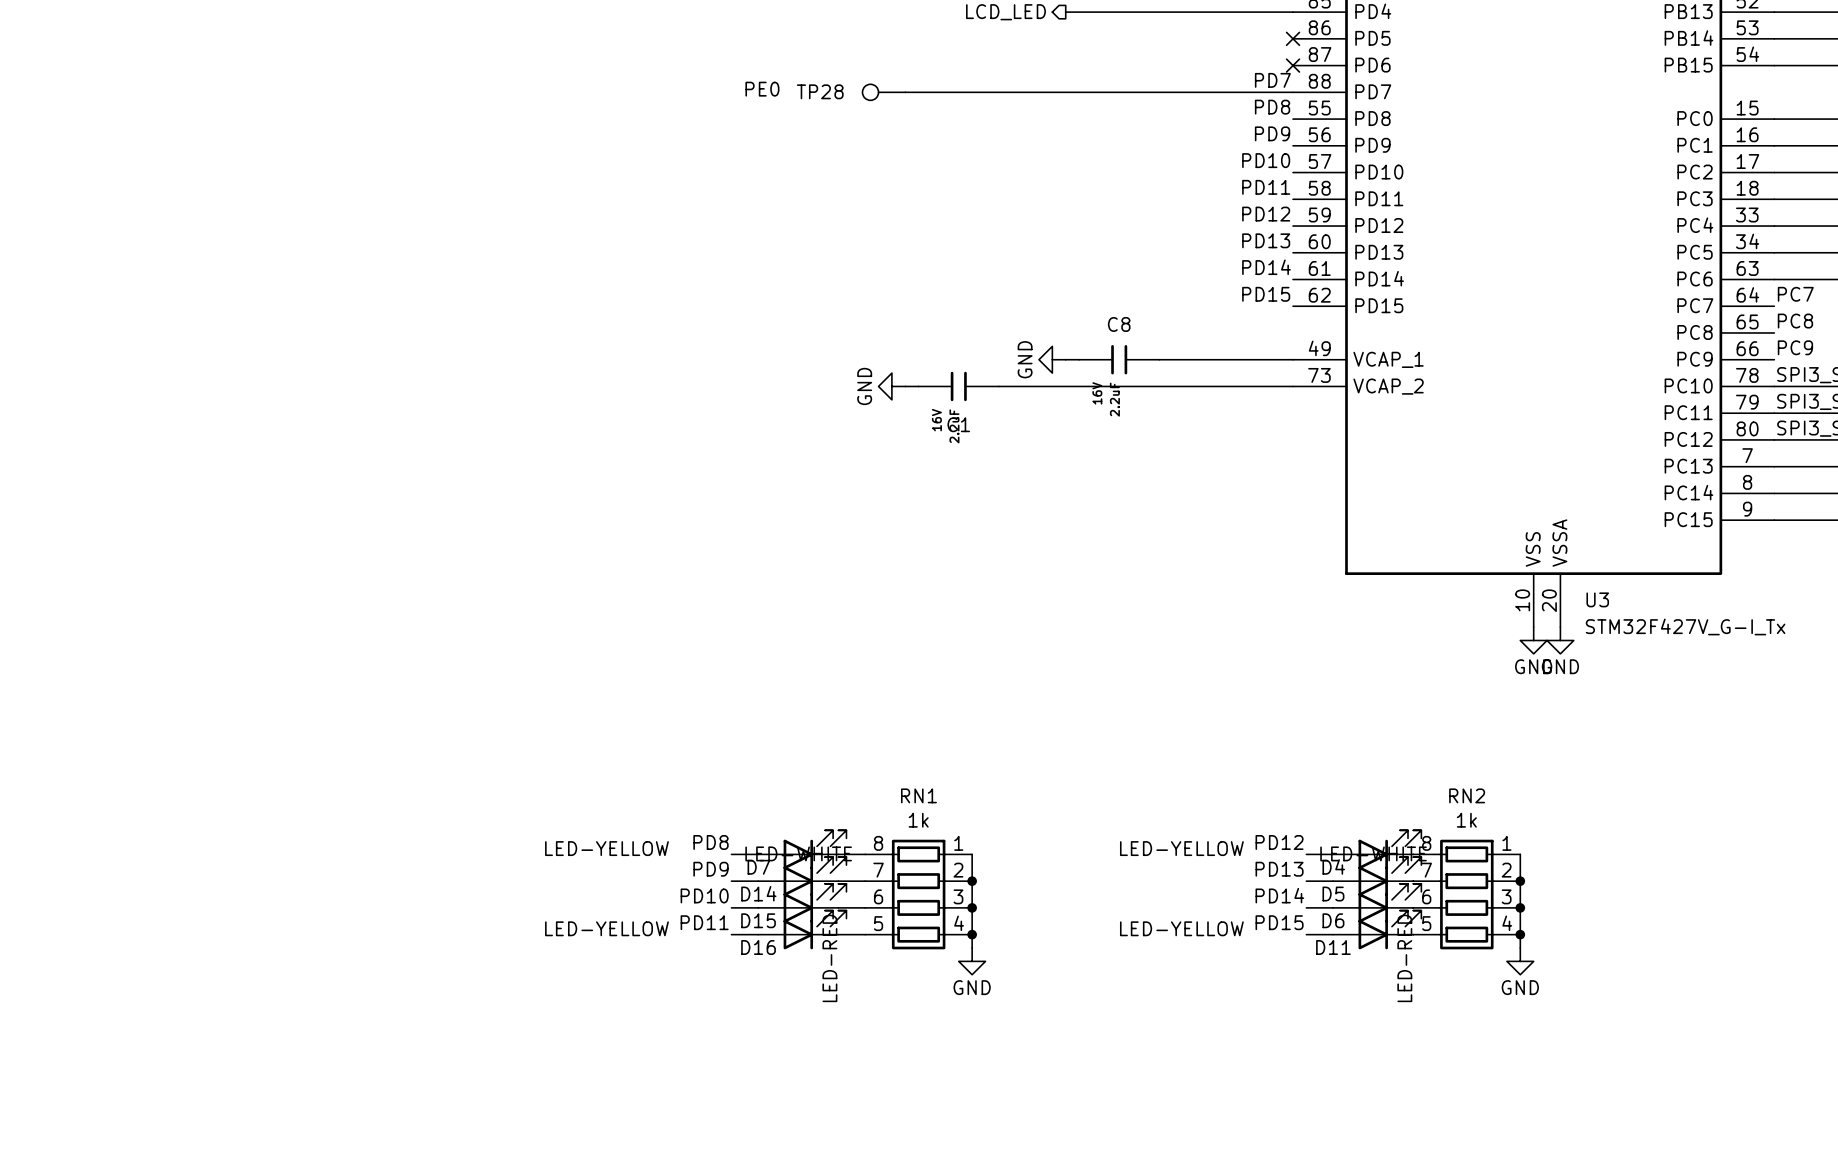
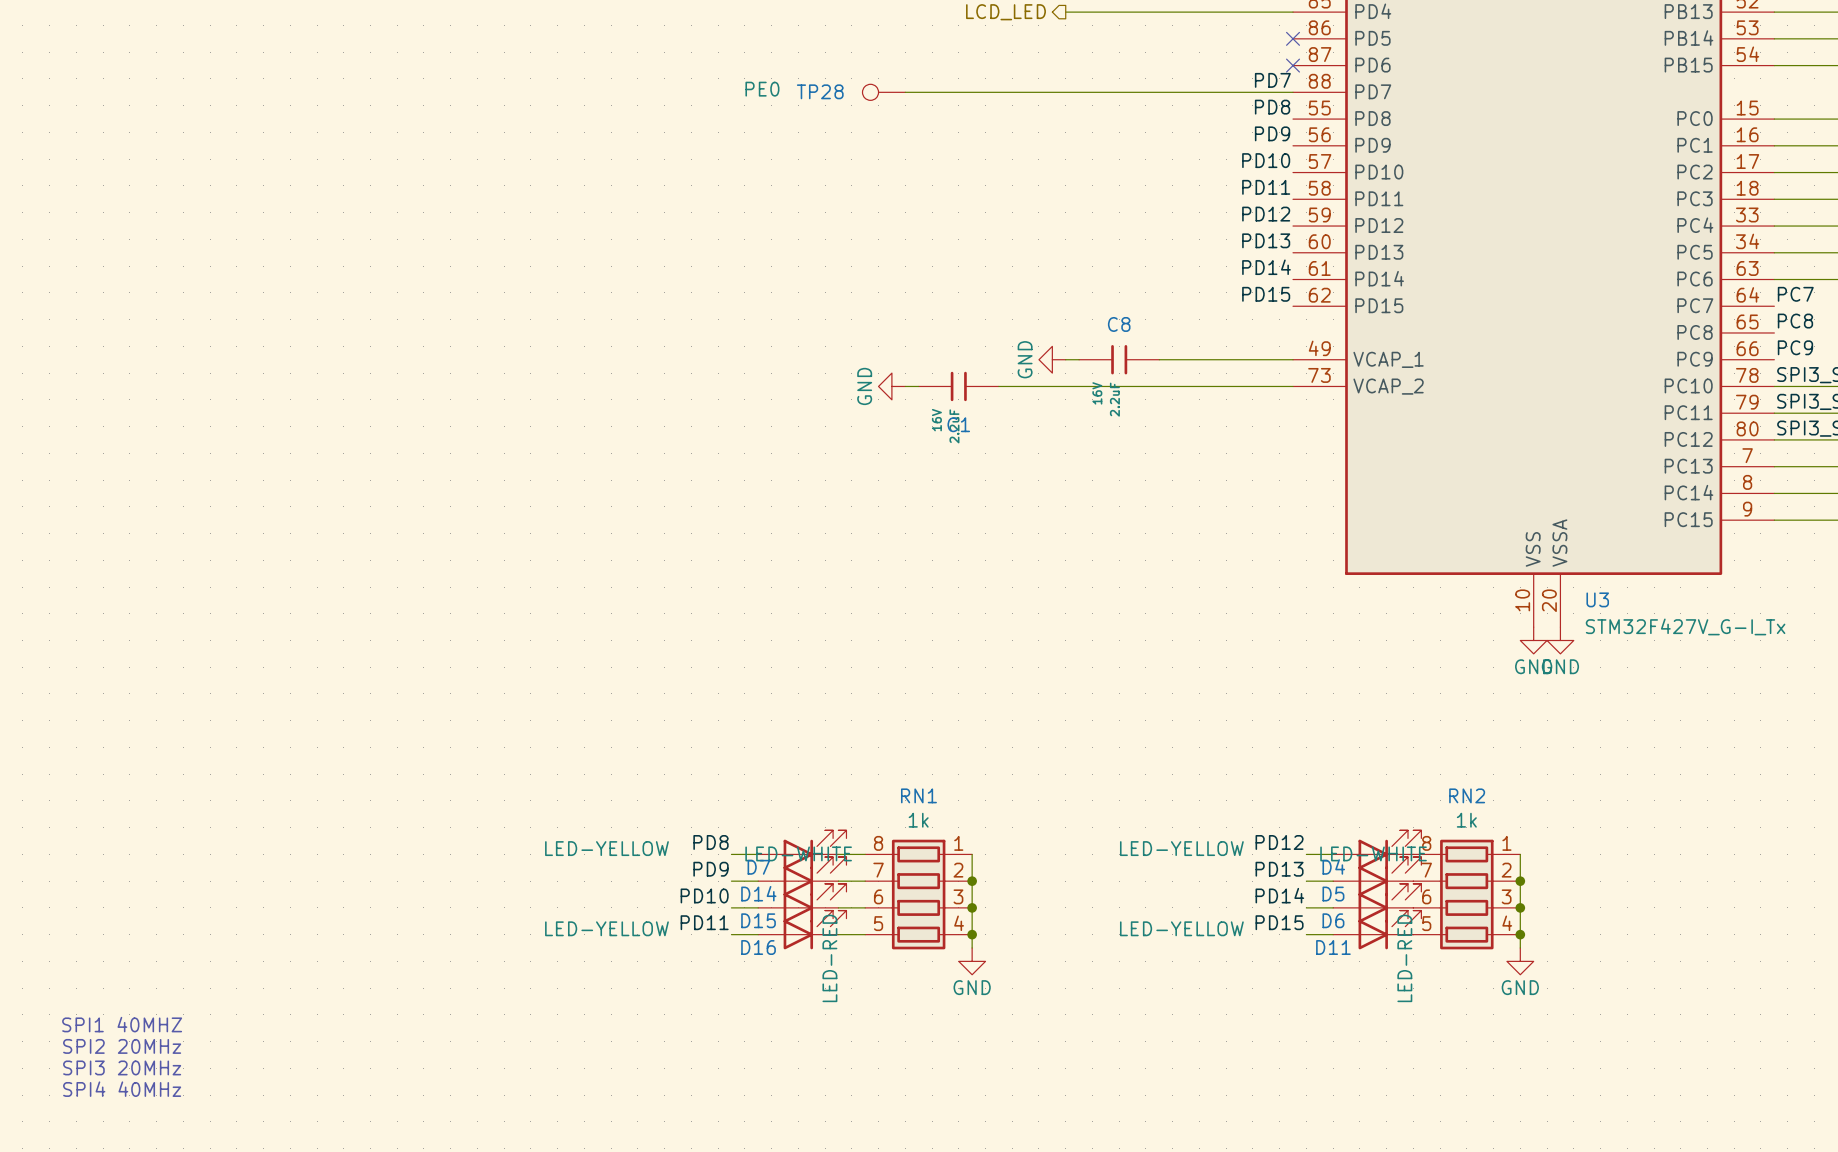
text: none -> SPI1 40MHZ (122, 1024)
text: none -> SPI2 20MHz (122, 1046)
text: none -> SPI3 20MHz (122, 1067)
text: none -> SPI4 40MHz (122, 1089)

